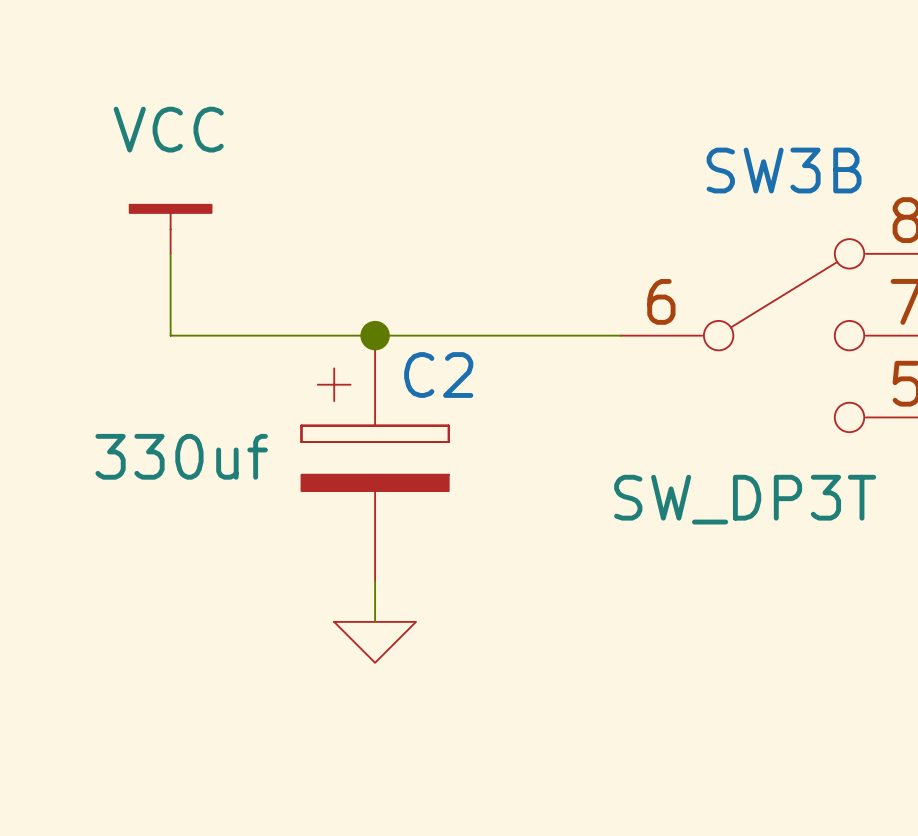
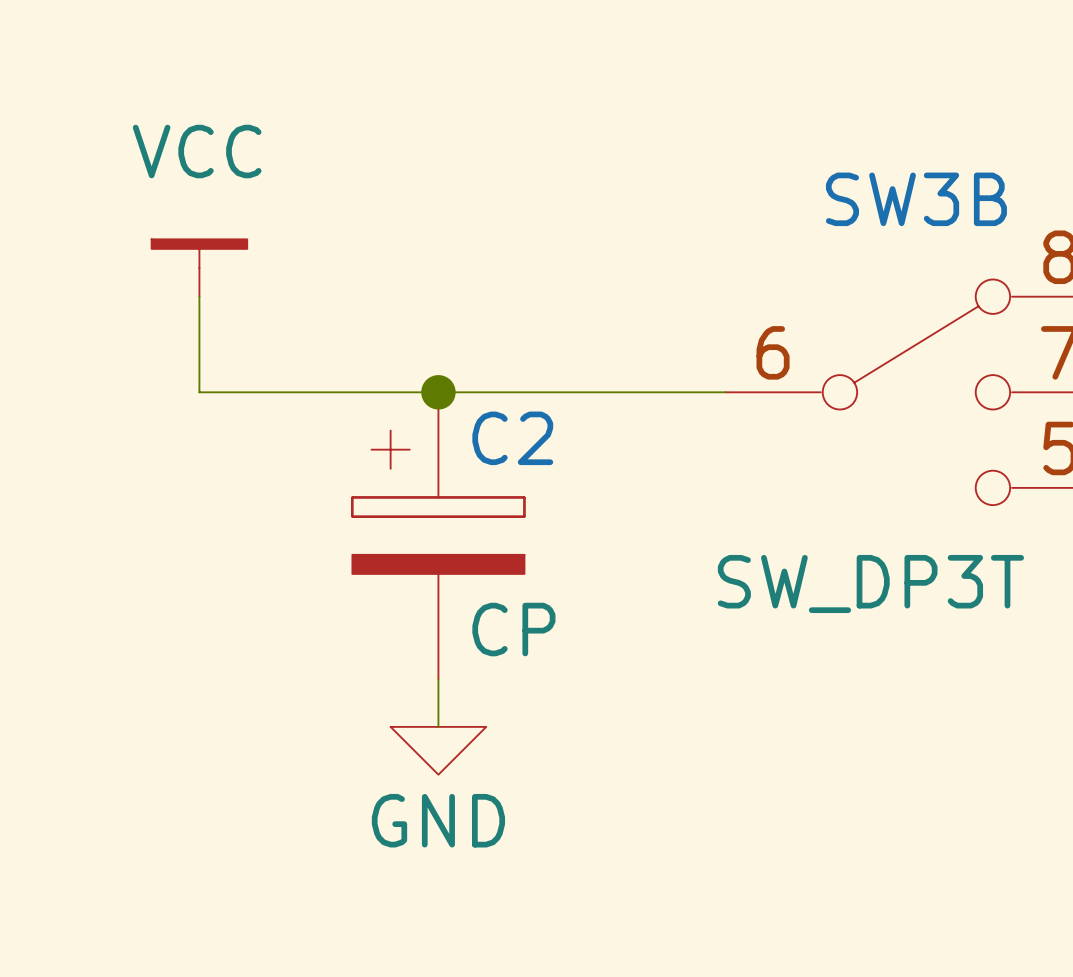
C2 value: 330uf (181, 456) -> CP (513, 629)
power symbol text: none -> GND (438, 820)

